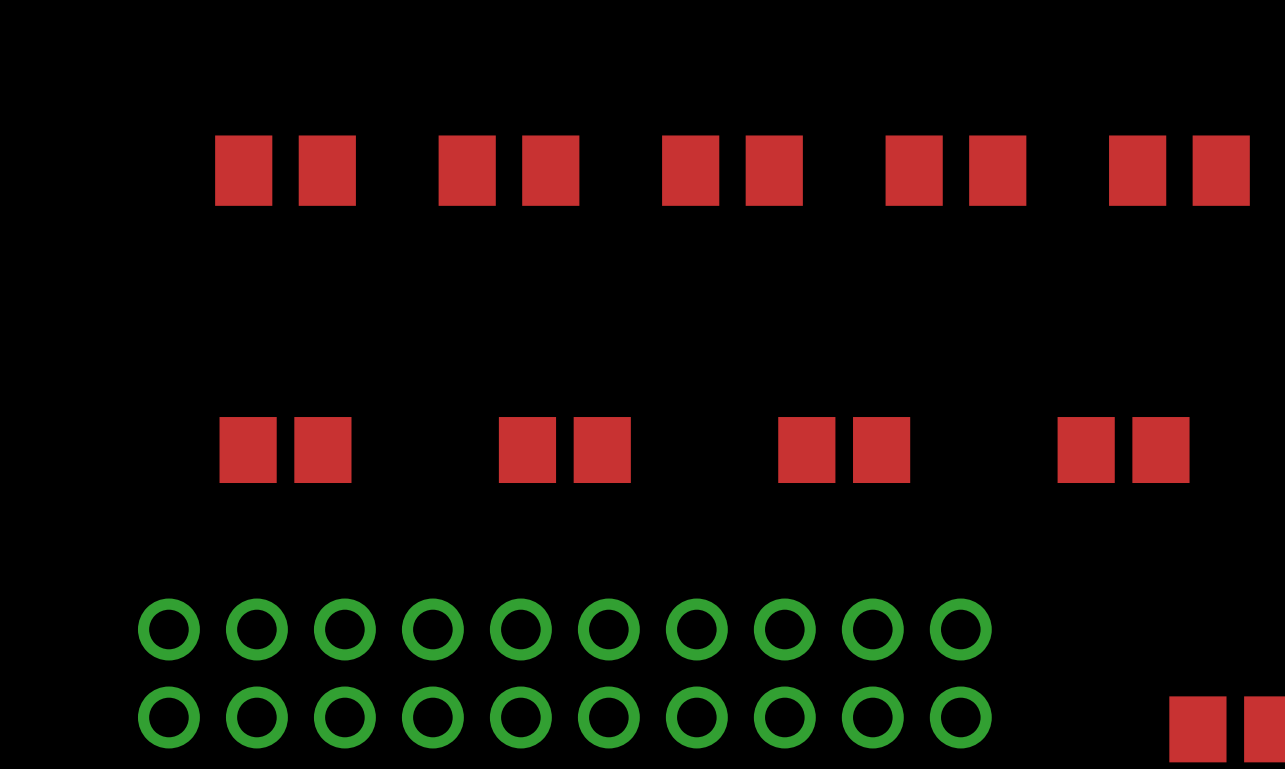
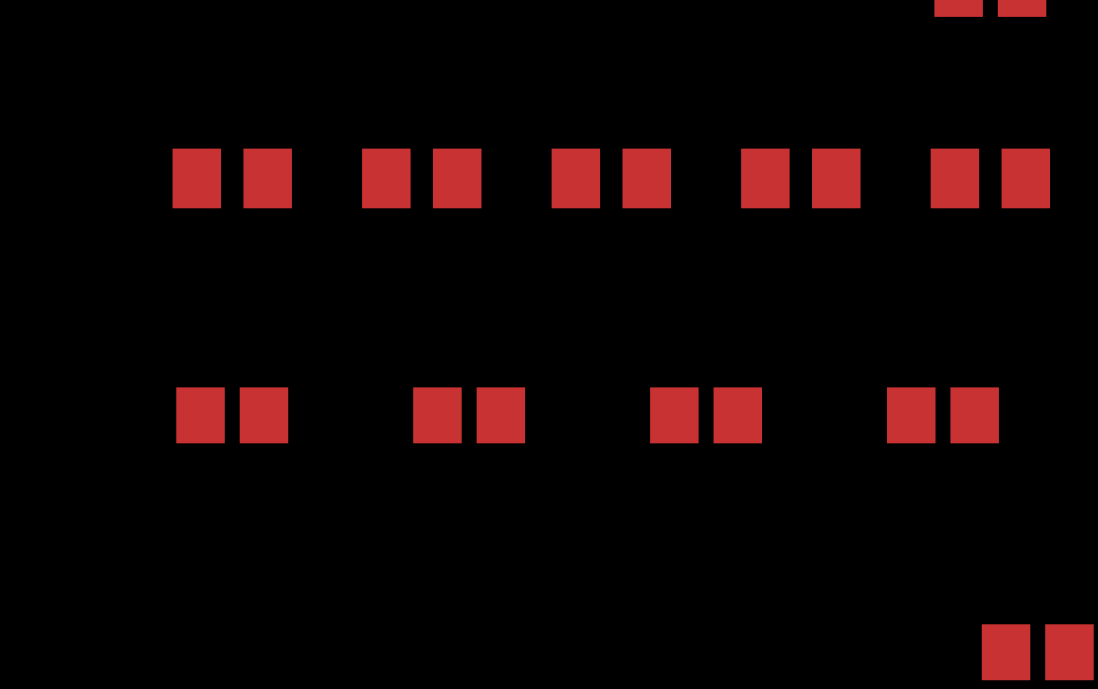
part: (564, 673) -> none

